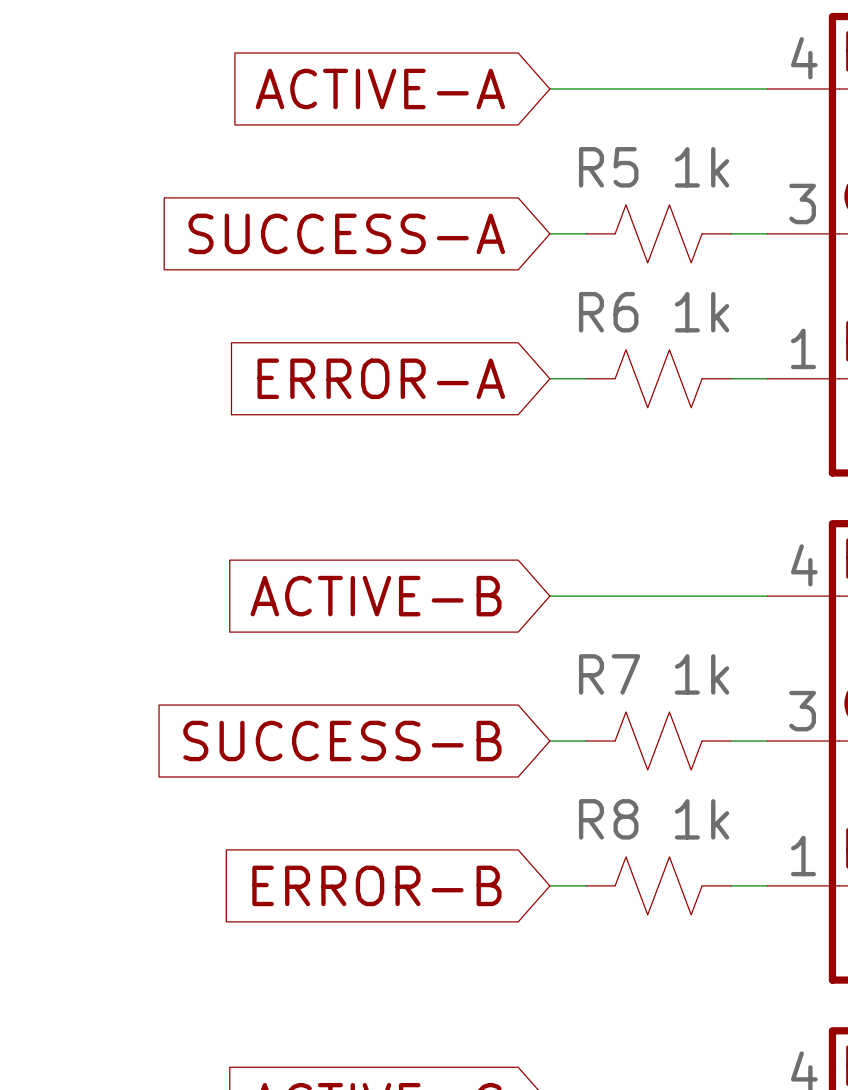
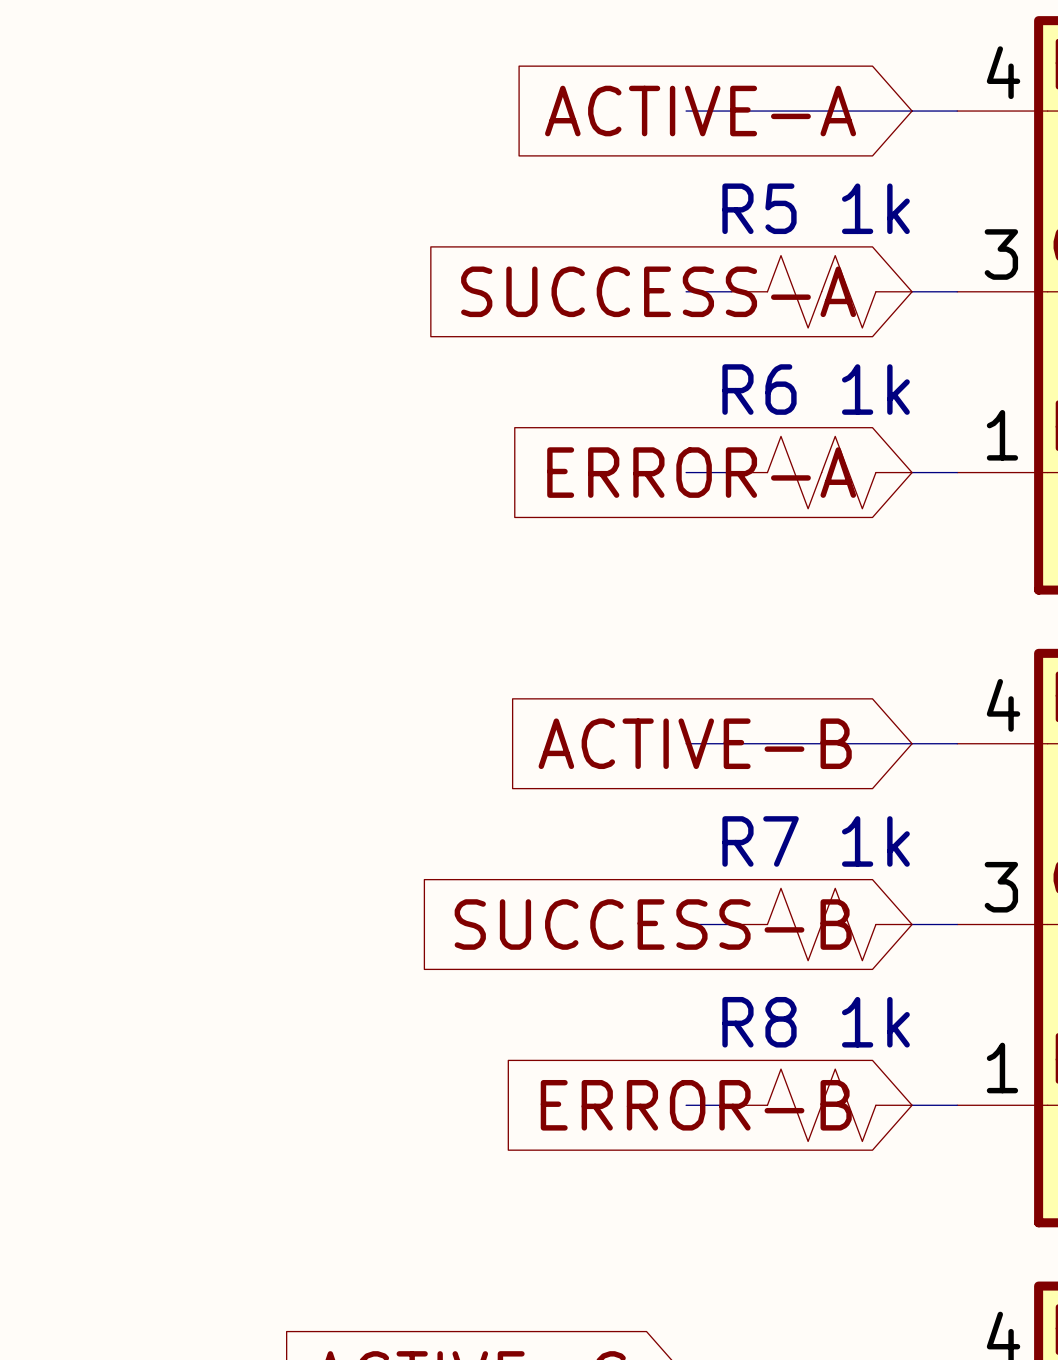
global label position: ACTIVE-A (380, 88) -> ACTIVE-A (700, 111)
global label position: SUCCESS-A (346, 233) -> SUCCESS-A (658, 291)
global label position: ERROR-A (381, 378) -> ERROR-A (701, 472)
global label position: ACTIVE-B (376, 596) -> ACTIVE-B (695, 743)
global label position: SUCCESS-B (342, 741) -> SUCCESS-B (653, 924)
global label position: ERROR-B (376, 885) -> ERROR-B (696, 1105)

